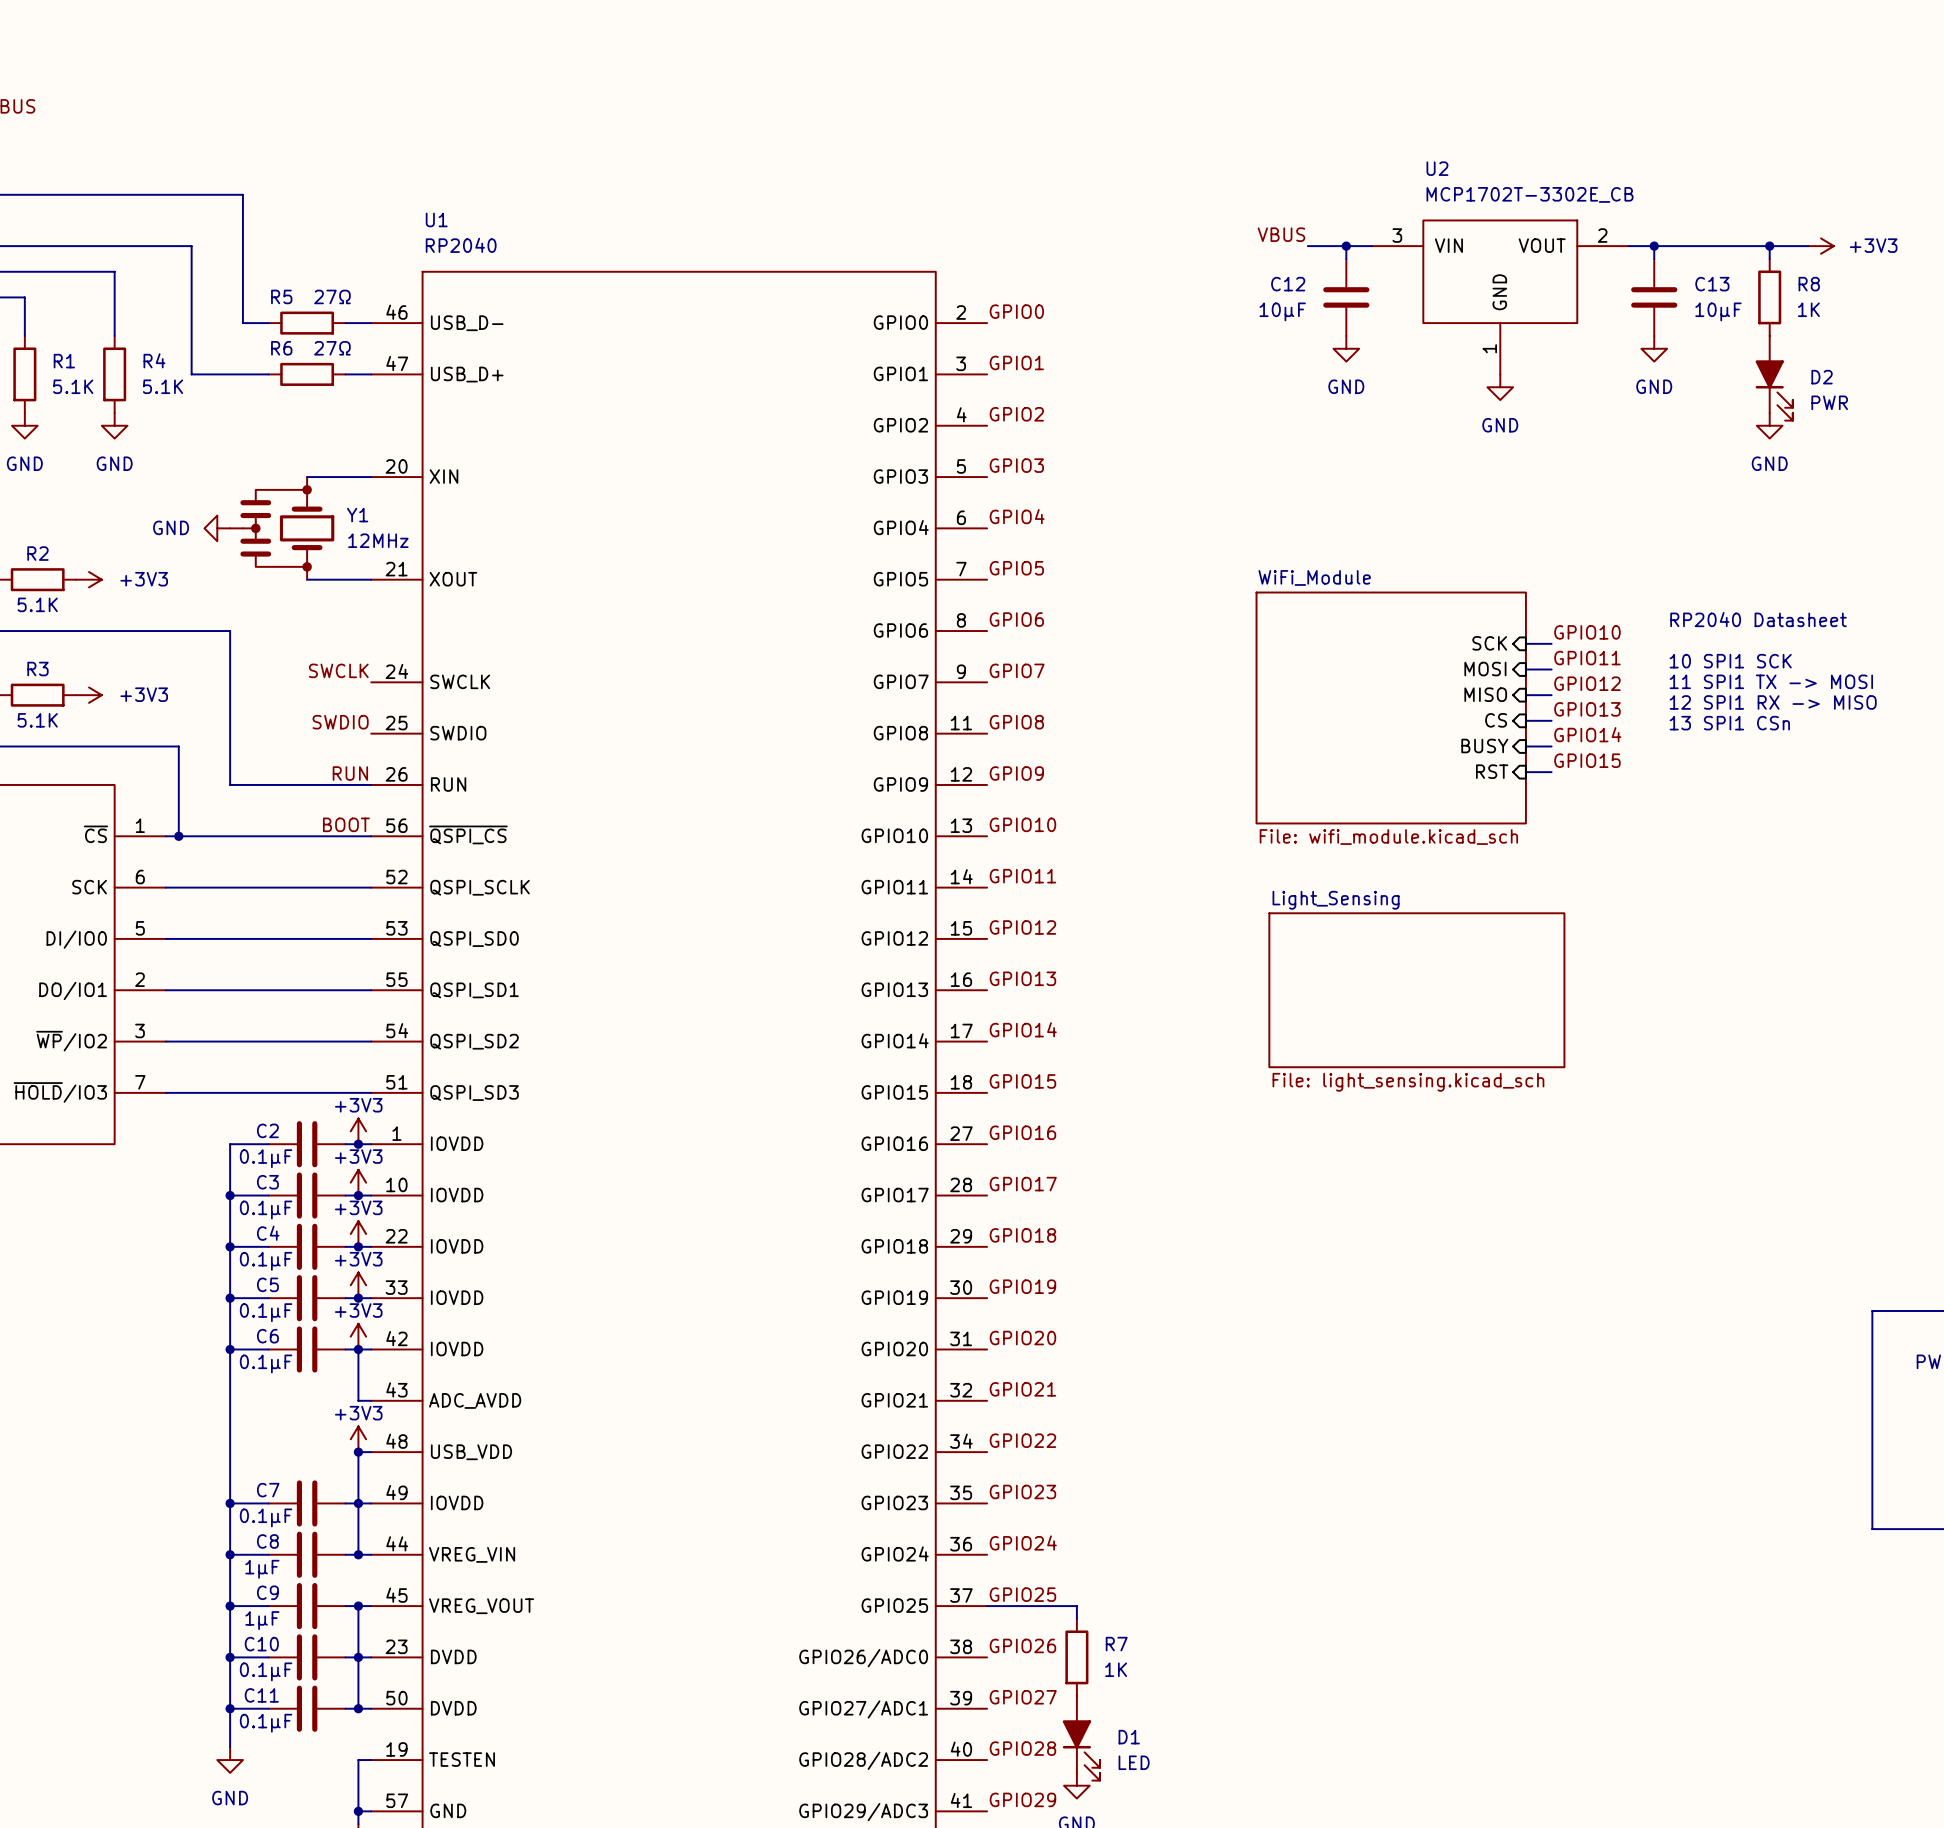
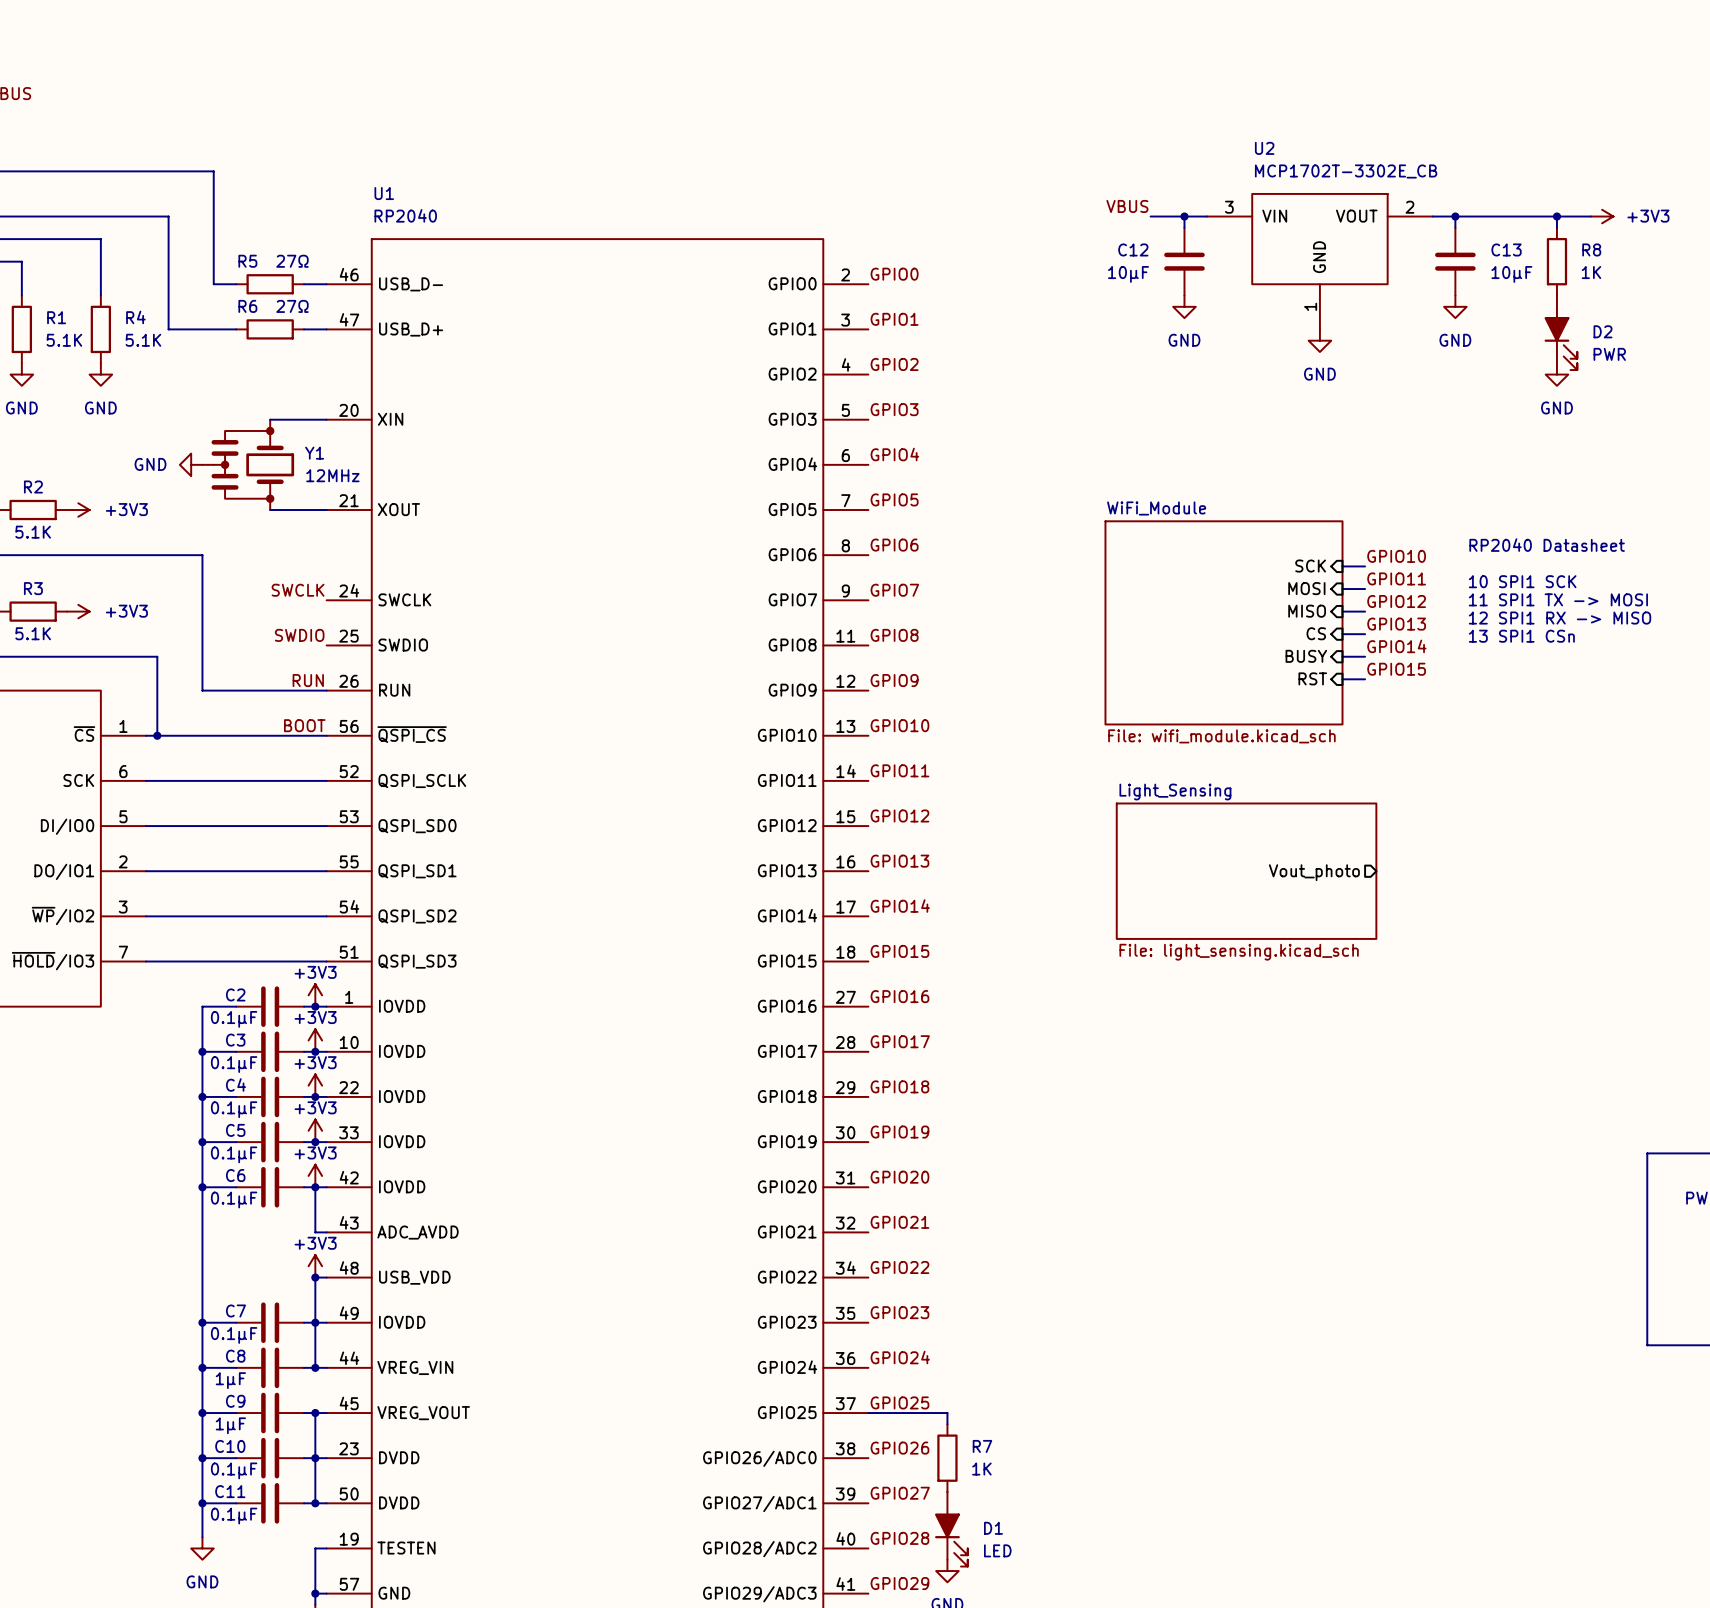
sheet pin: none -> Vout_photo (1314, 872)

